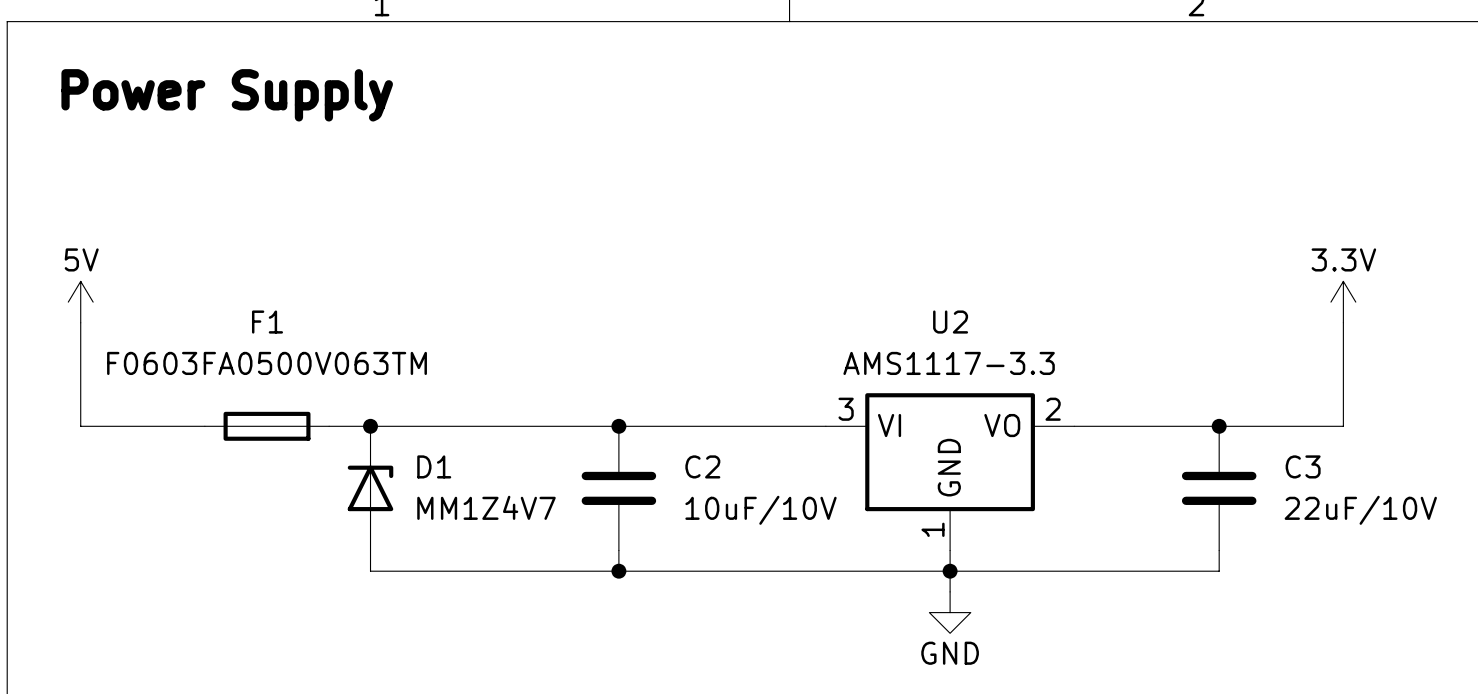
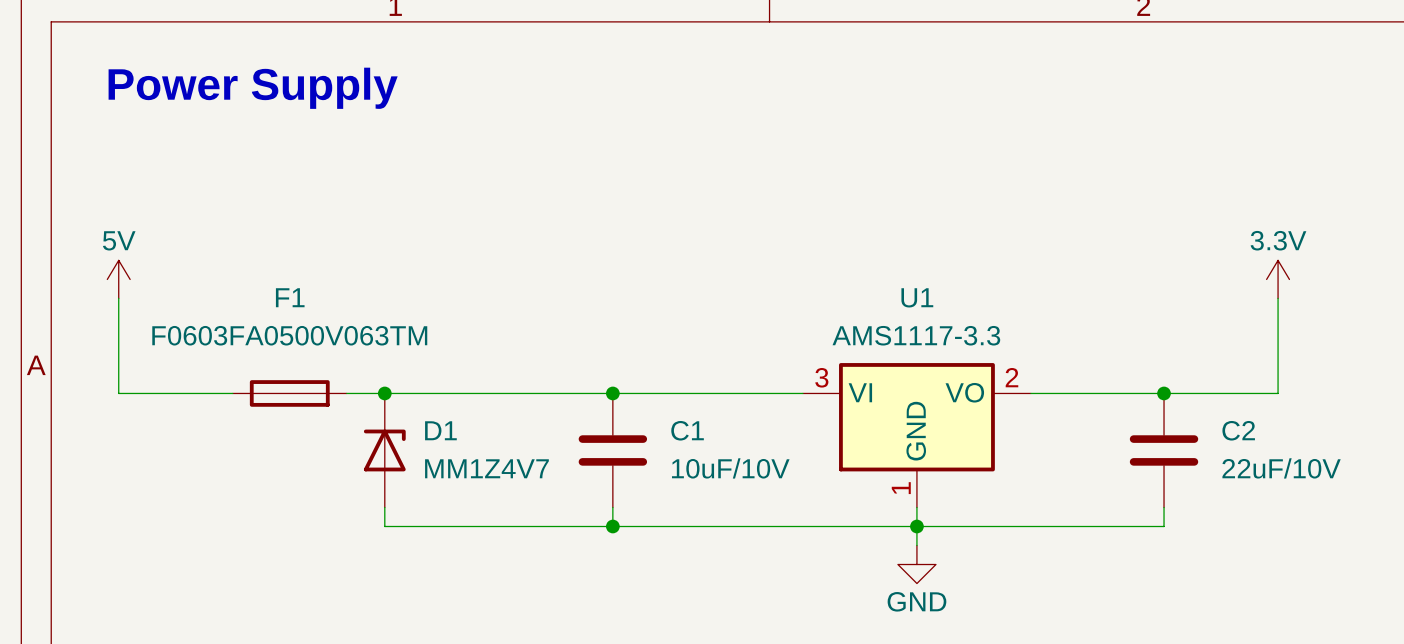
U2 name: U2 (950, 322) -> U1 (917, 297)
C2 name: C2 (702, 466) -> C1 (687, 430)
C3 name: C3 (1303, 466) -> C2 (1238, 430)

